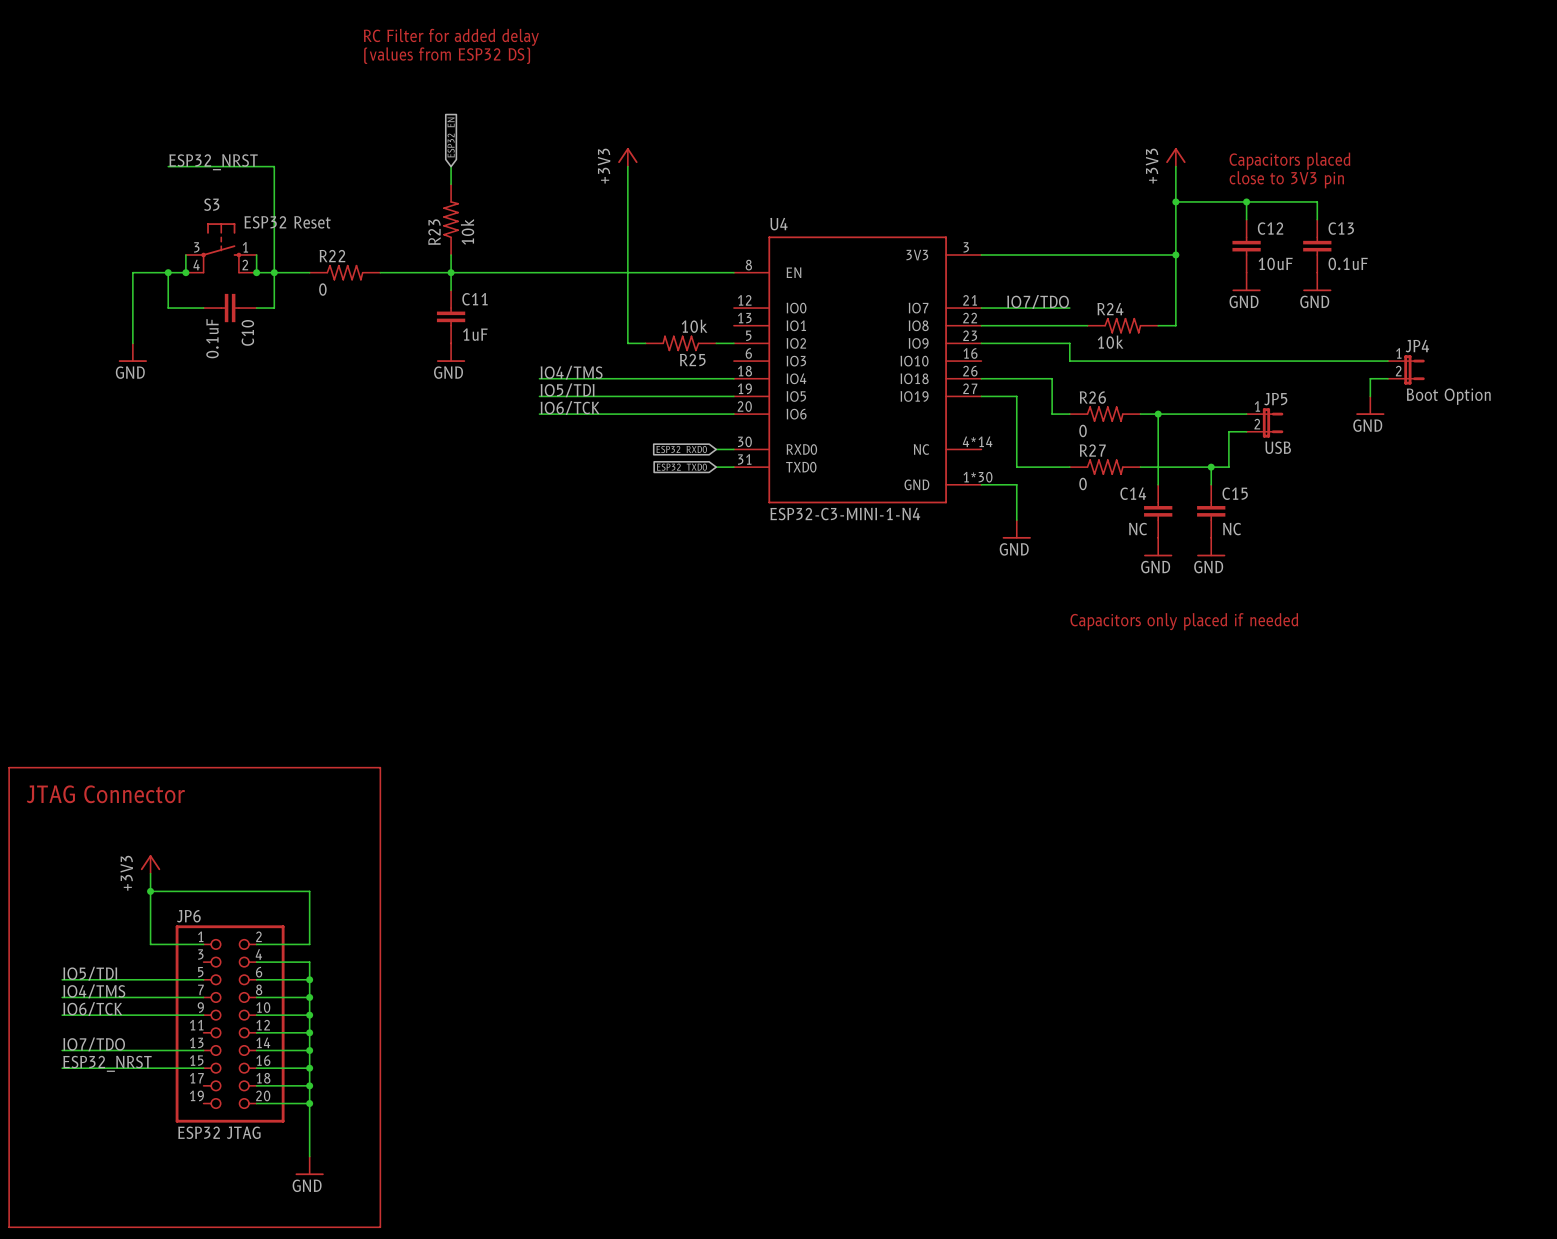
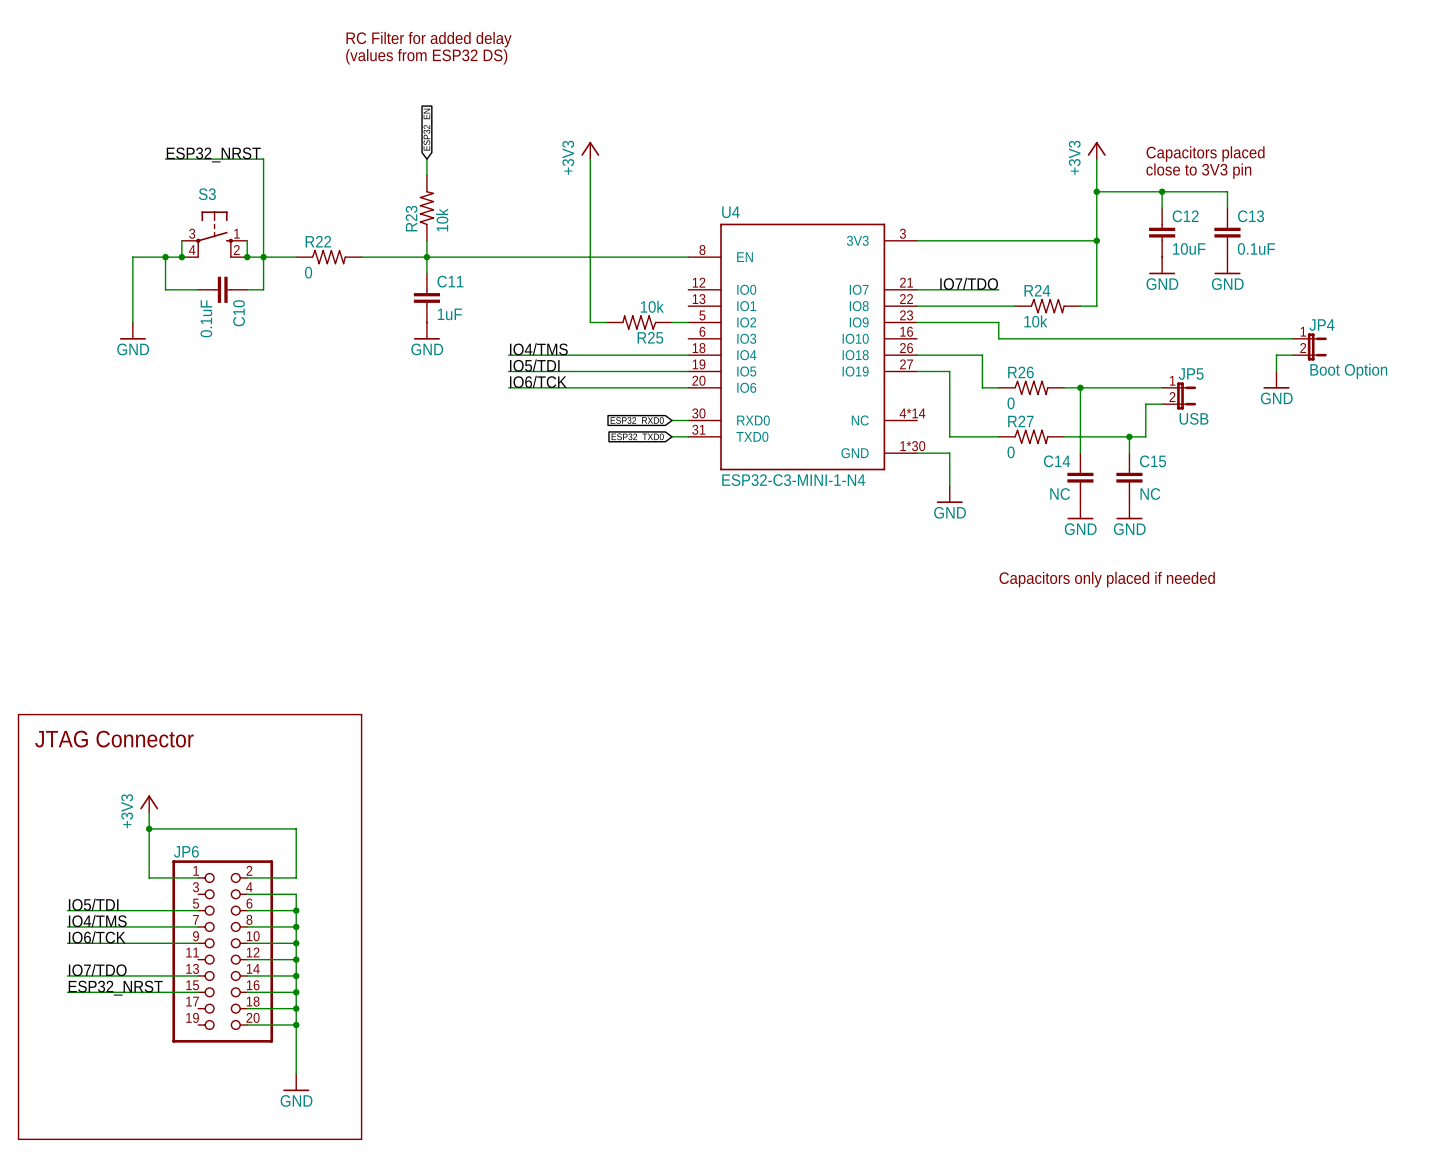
S3 value: ESP32 Reset (287, 222) -> none
JP6 value: ESP32 JTAG (219, 1132) -> none

